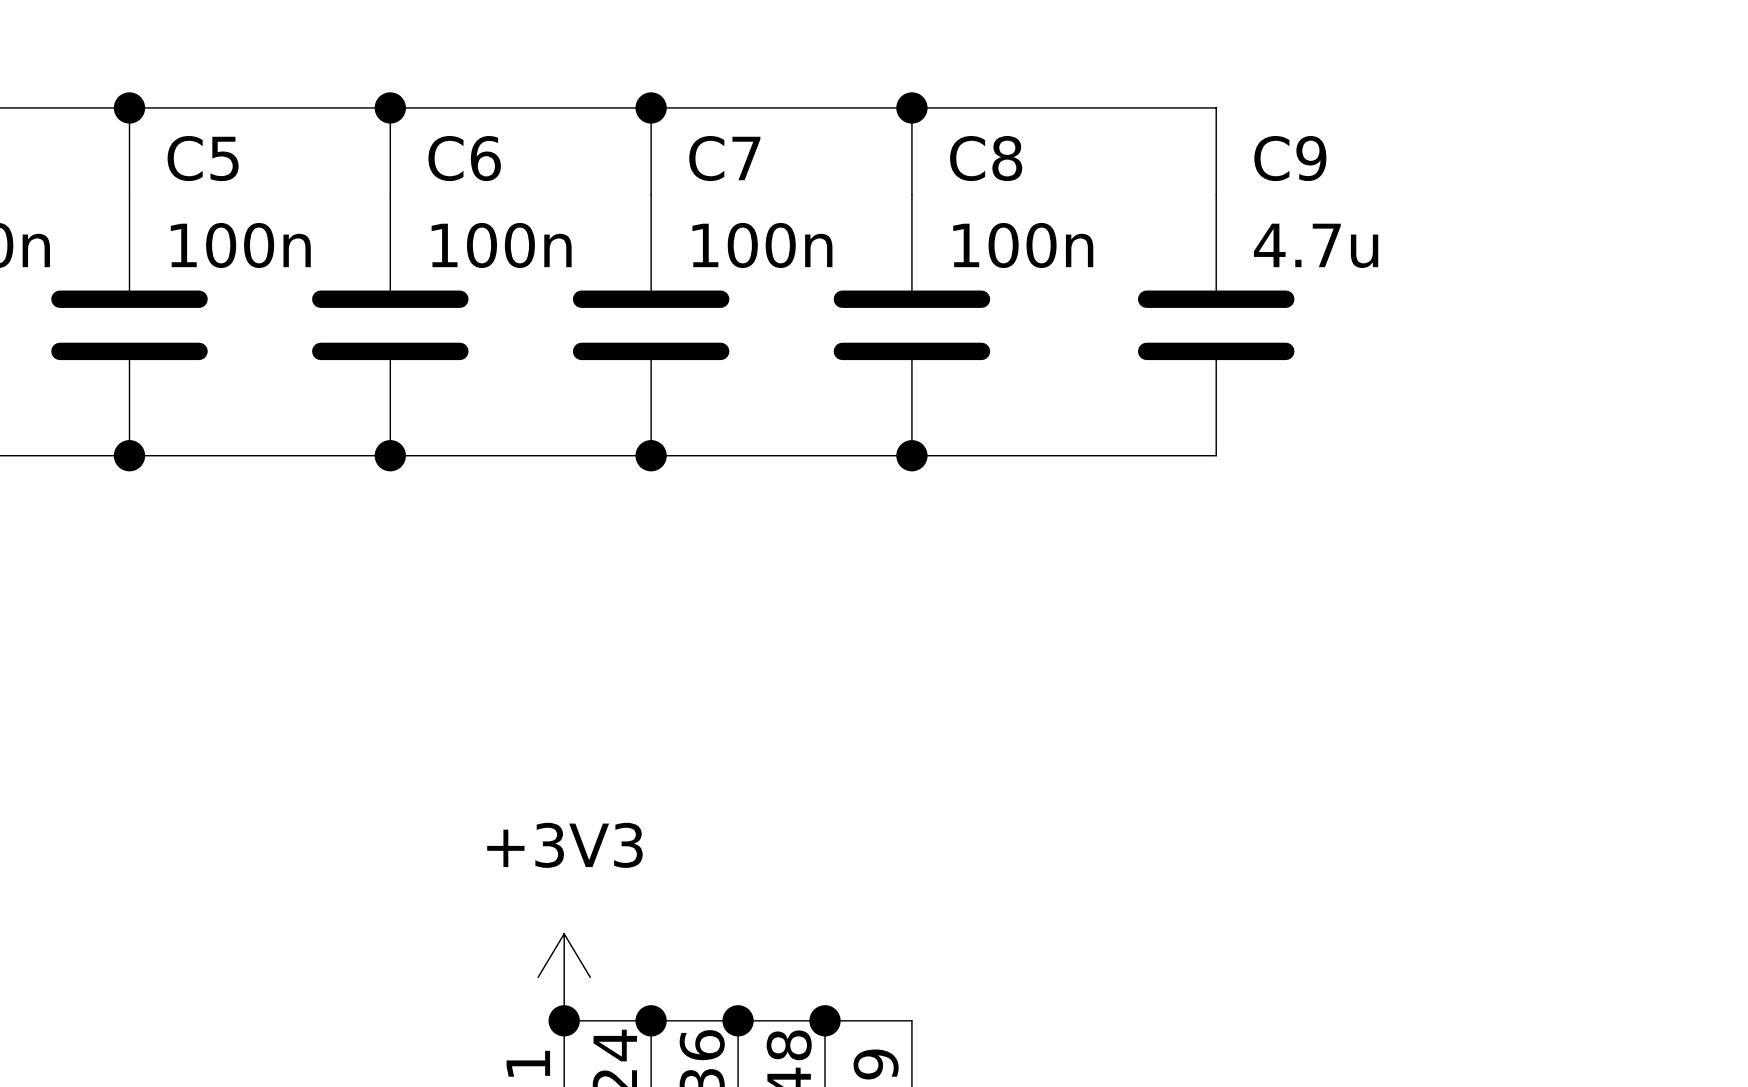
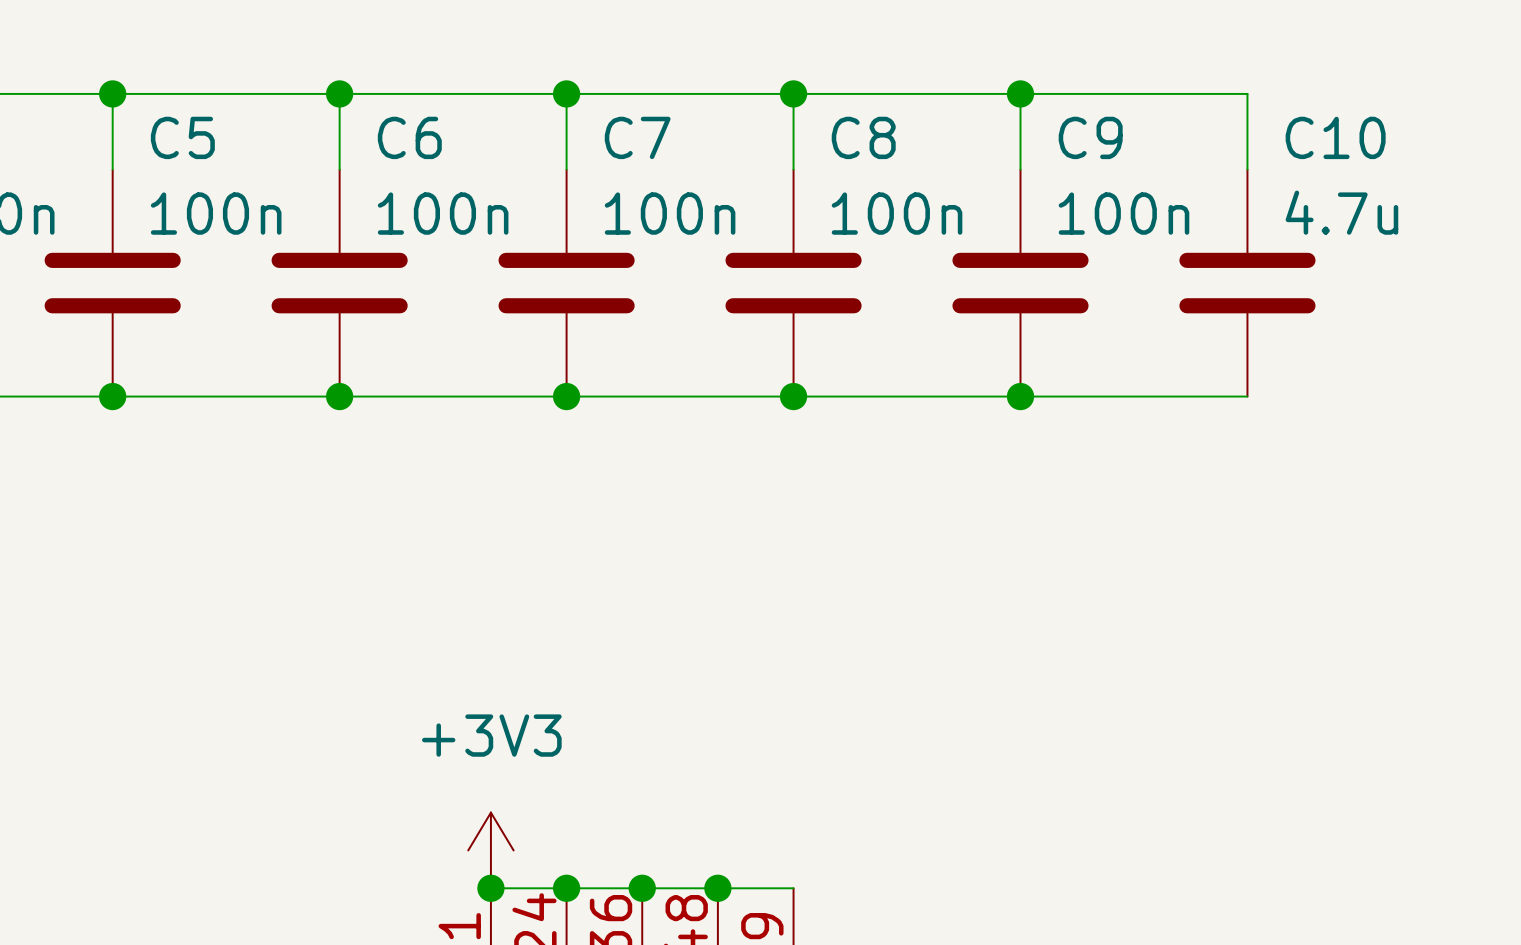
wire: none -> (1020, 93) (1020, 169)
junction: none -> (1020, 93)
wire: (1216, 107) (1216, 194) -> (1058, 93) (1247, 93) (1247, 169)
C9 value: 4.7u (1316, 245) -> 100n (1123, 213)
C9 position: (1216, 325) -> (1020, 283)
C10: none -> 4.7u (1247, 283)
junction: none -> (1020, 396)
wire: none -> (1058, 396) (1247, 396)

